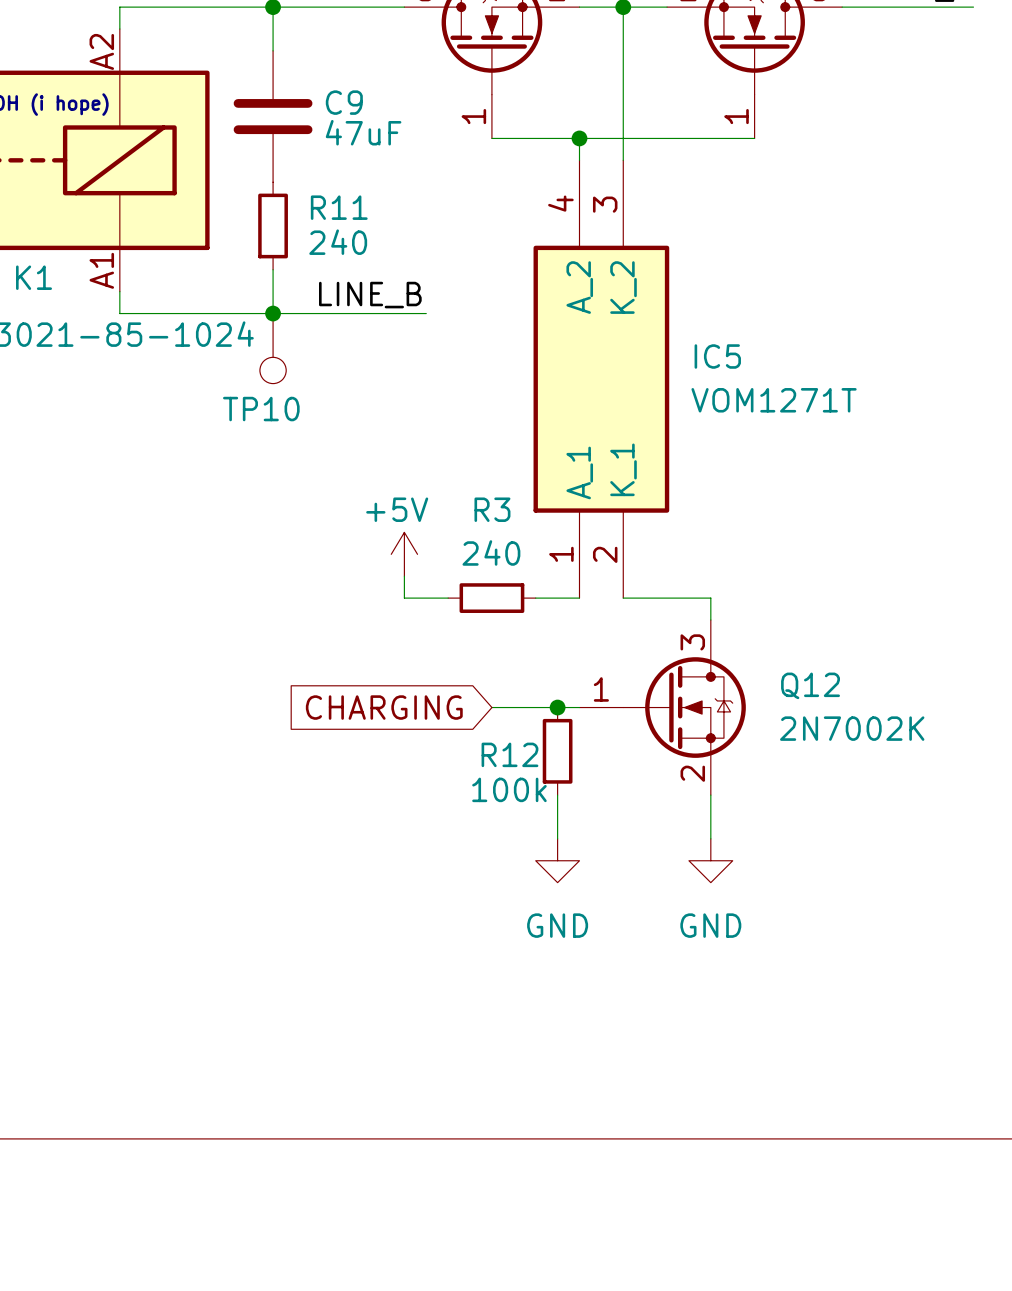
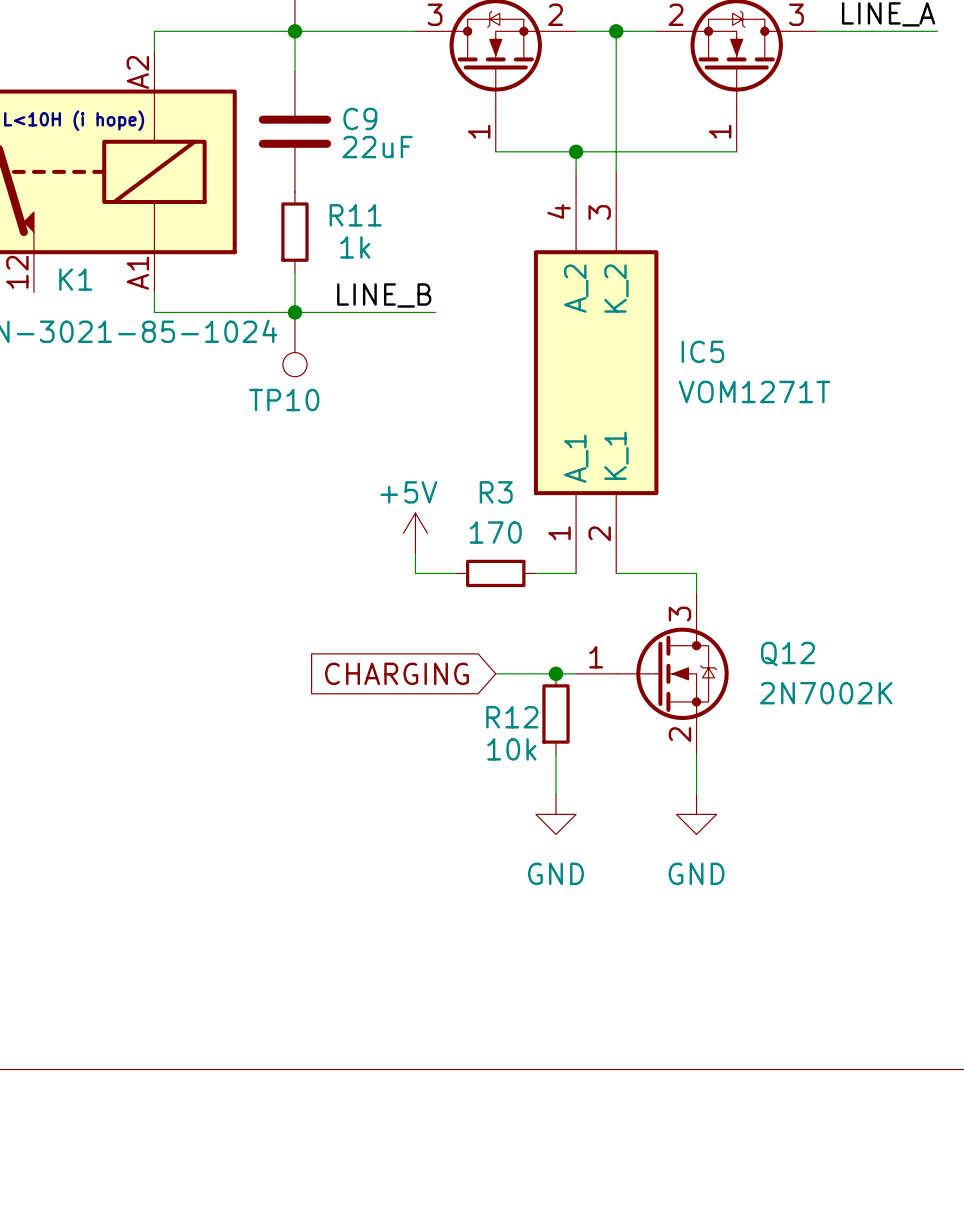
C9 value: 47uF (363, 132) -> 22uF (377, 147)
R11 value: 240 (338, 242) -> 1k (355, 247)
R3 value: 240 (491, 552) -> 170 (495, 532)
R12 value: 100k (509, 789) -> 10k (511, 749)

